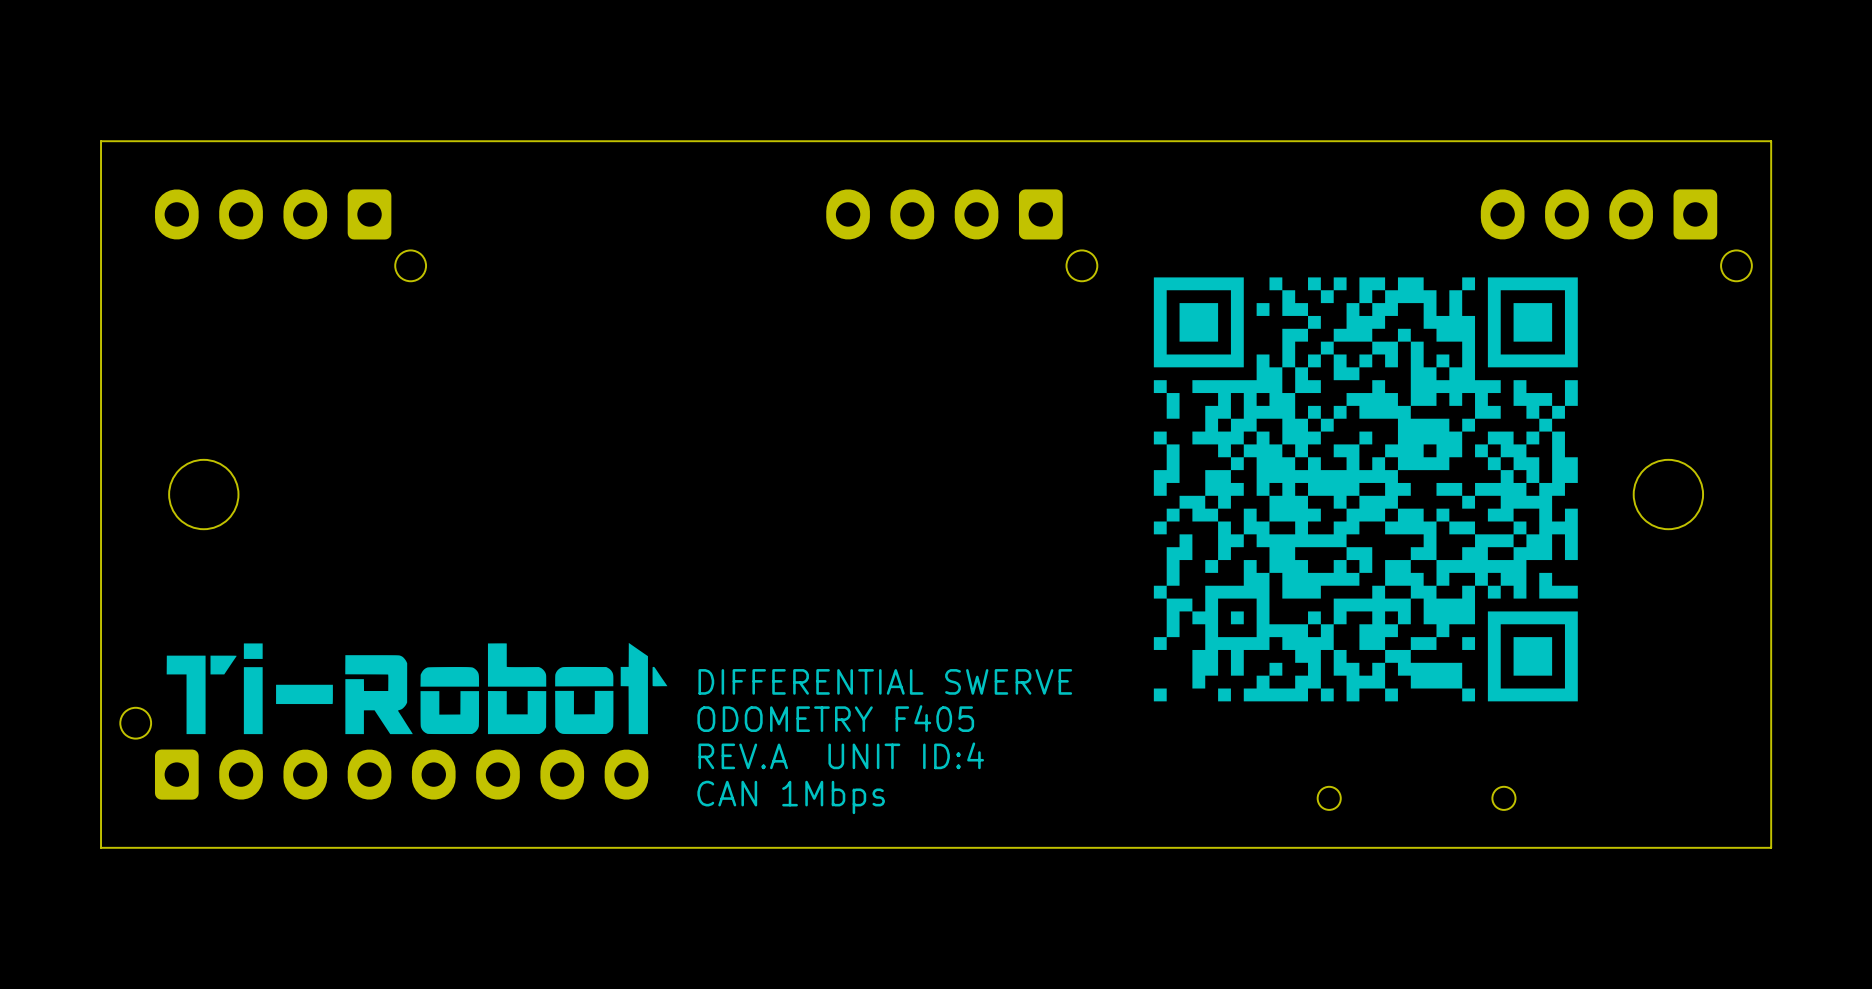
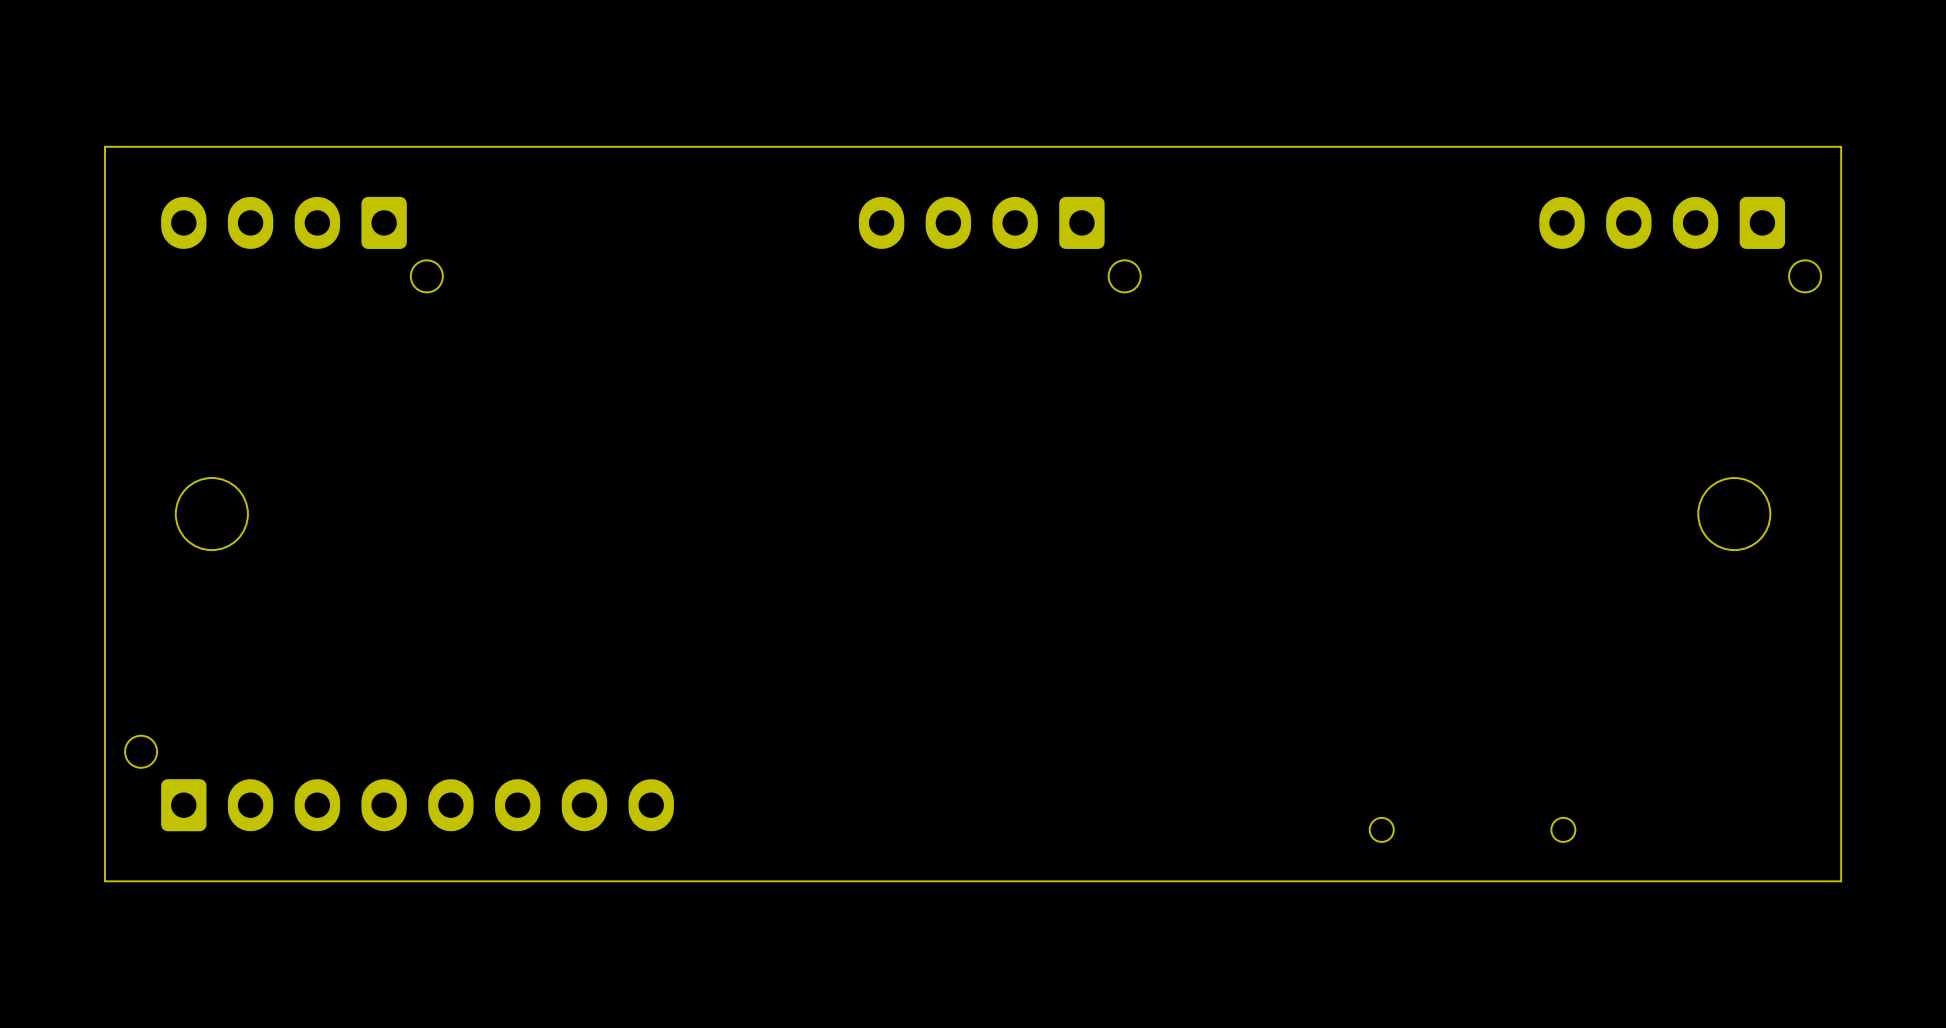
drawing: [1153, 277, 1578, 702] -> none
drawing: [166, 642, 668, 735] -> none
text: DIFFERENTIAL SWERVE (885, 681) -> none
text: ODOMETRY F405 (835, 718) -> none
text: REV.A UNIT ID:4 (841, 755) -> none
text: CAN 1Mbps (791, 797) -> none

